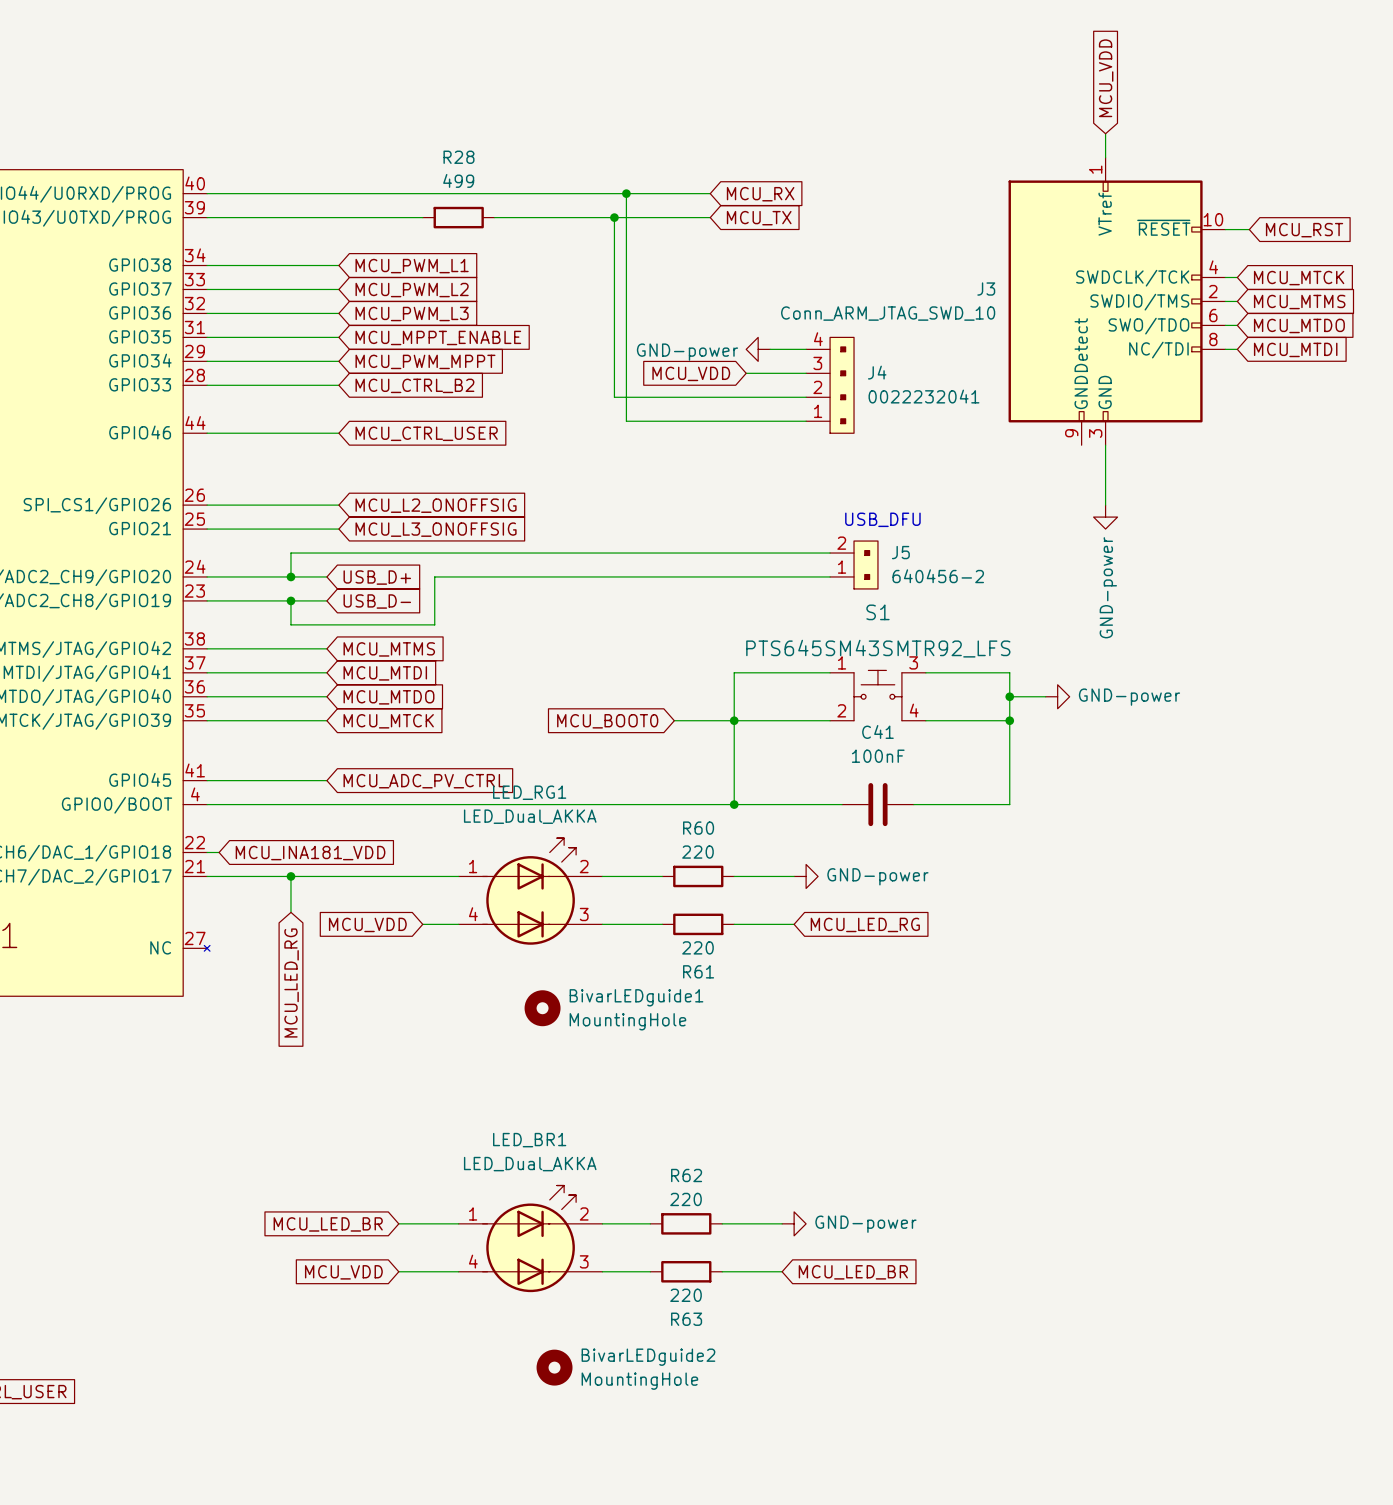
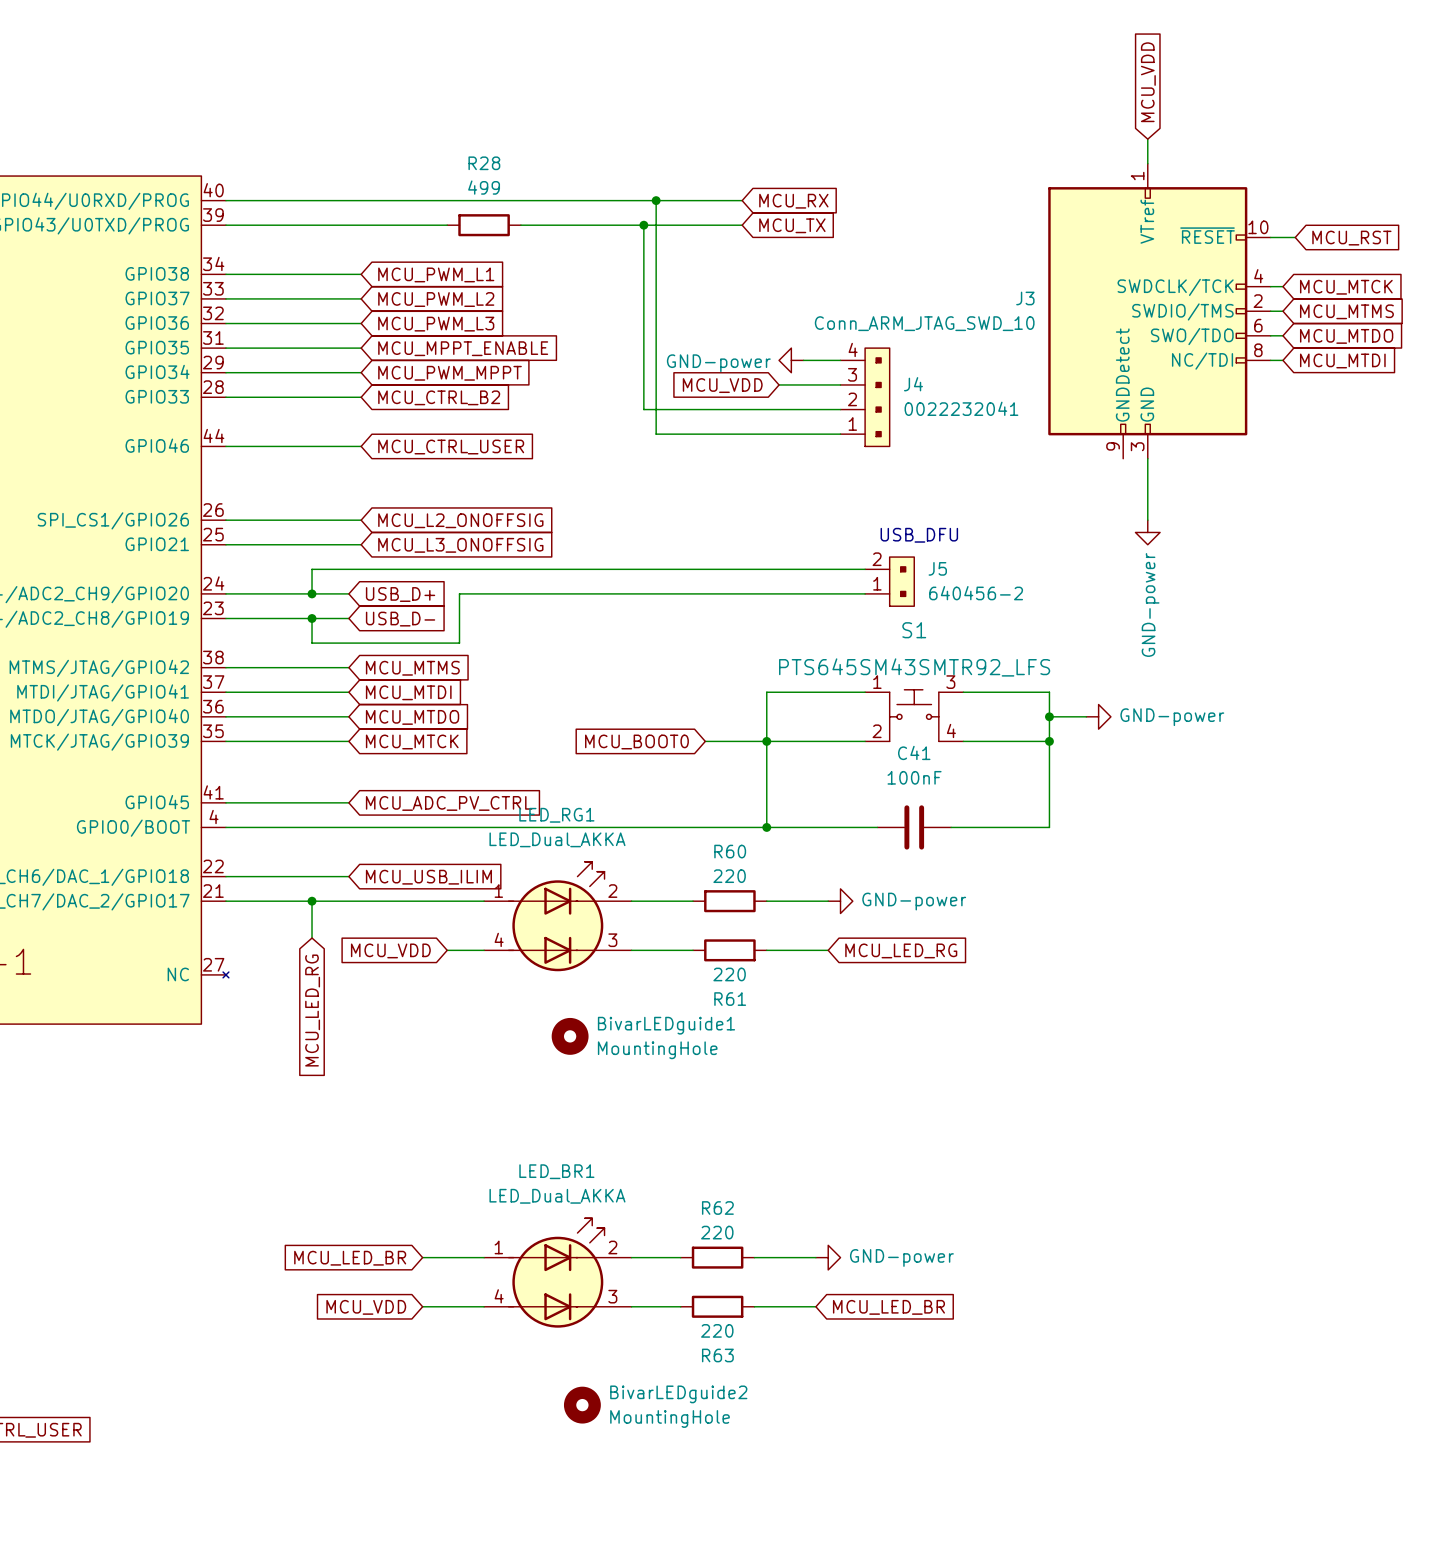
wire: none -> (238, 876) (348, 876)
global label: MCU_INA181_VDD (310, 853) -> none
global label: none -> MCU_USB_ILIM (428, 877)

